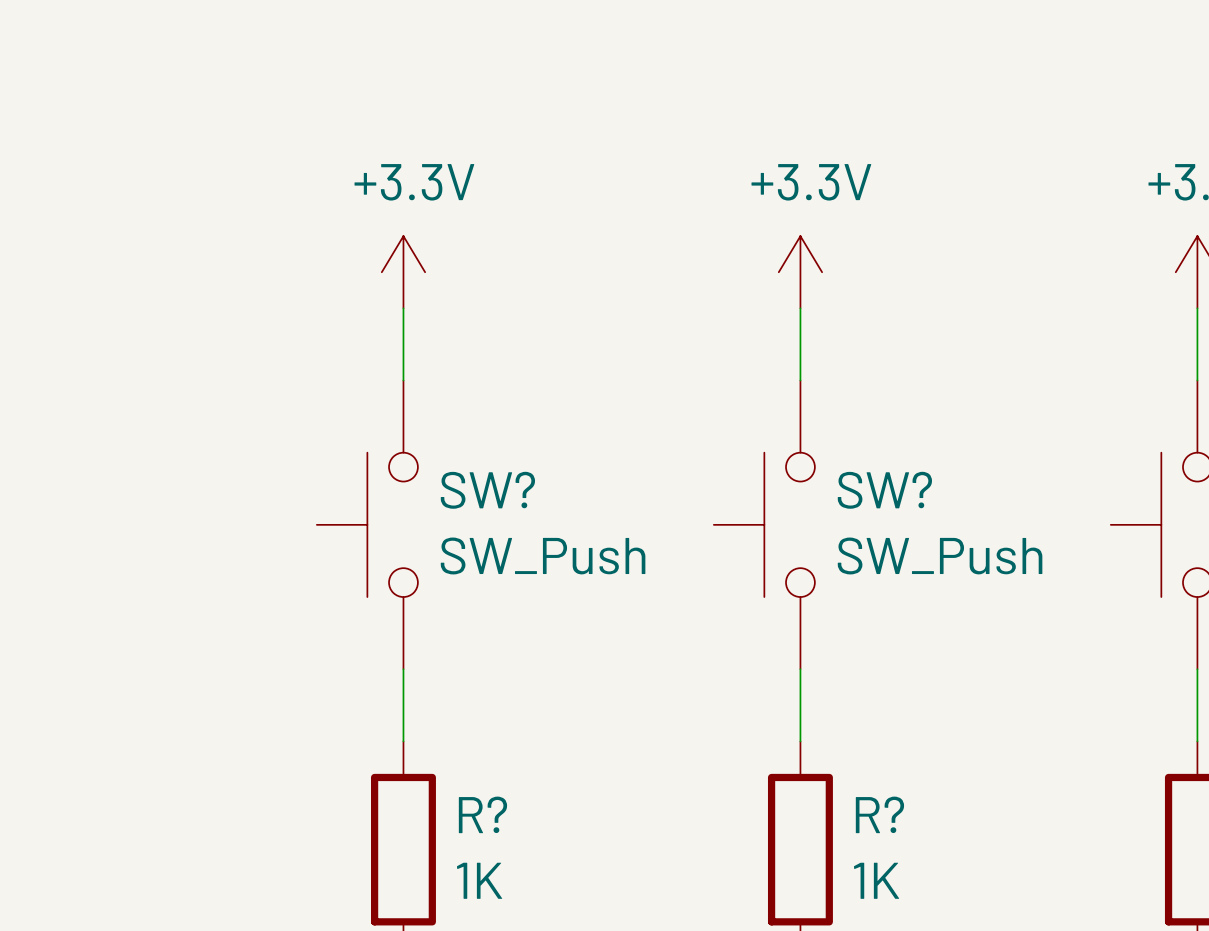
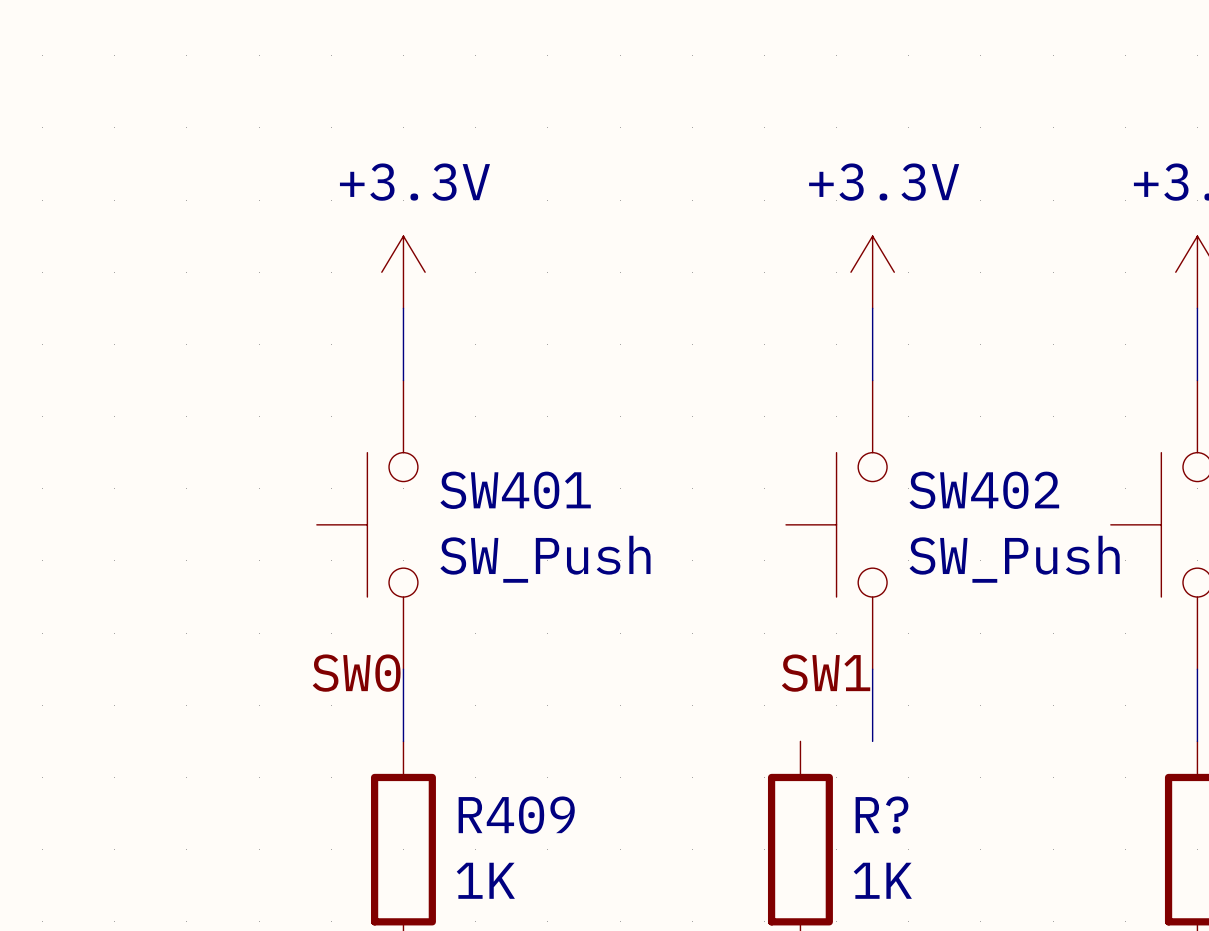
power symbol position: +3.3V (800, 272) -> +3.3V (872, 272)
wire: (800, 308) (800, 380) -> (872, 308) (872, 380)
SW? name: SW? (487, 490) -> SW401 (515, 490)
SW?: SW_Push (764, 524) -> none
SW402: none -> SW_Push (836, 524)
wire: (800, 669) (800, 741) -> (872, 669) (872, 741)
label: none -> SW0 (356, 673)
label: none -> SW1 (826, 673)
R? name: R? (482, 814) -> R409 (516, 815)

